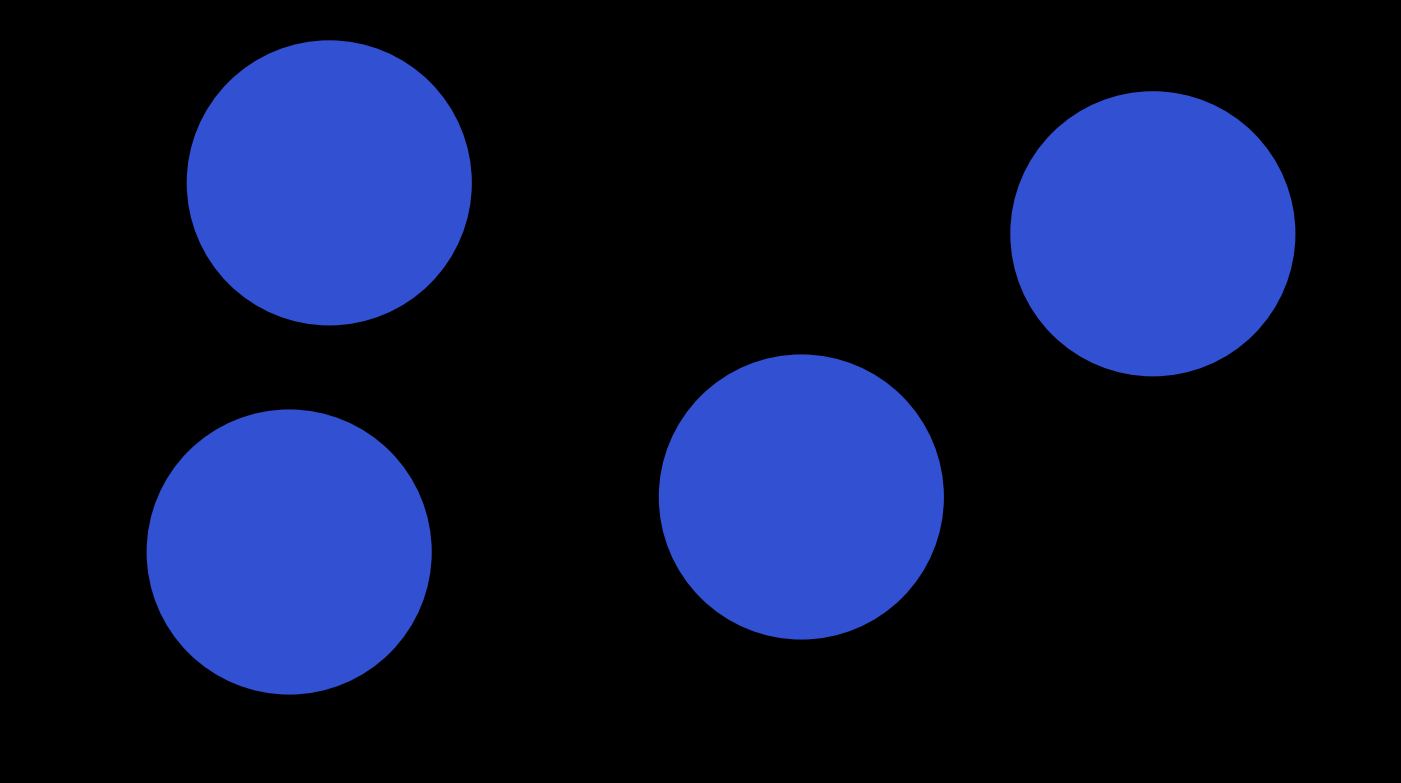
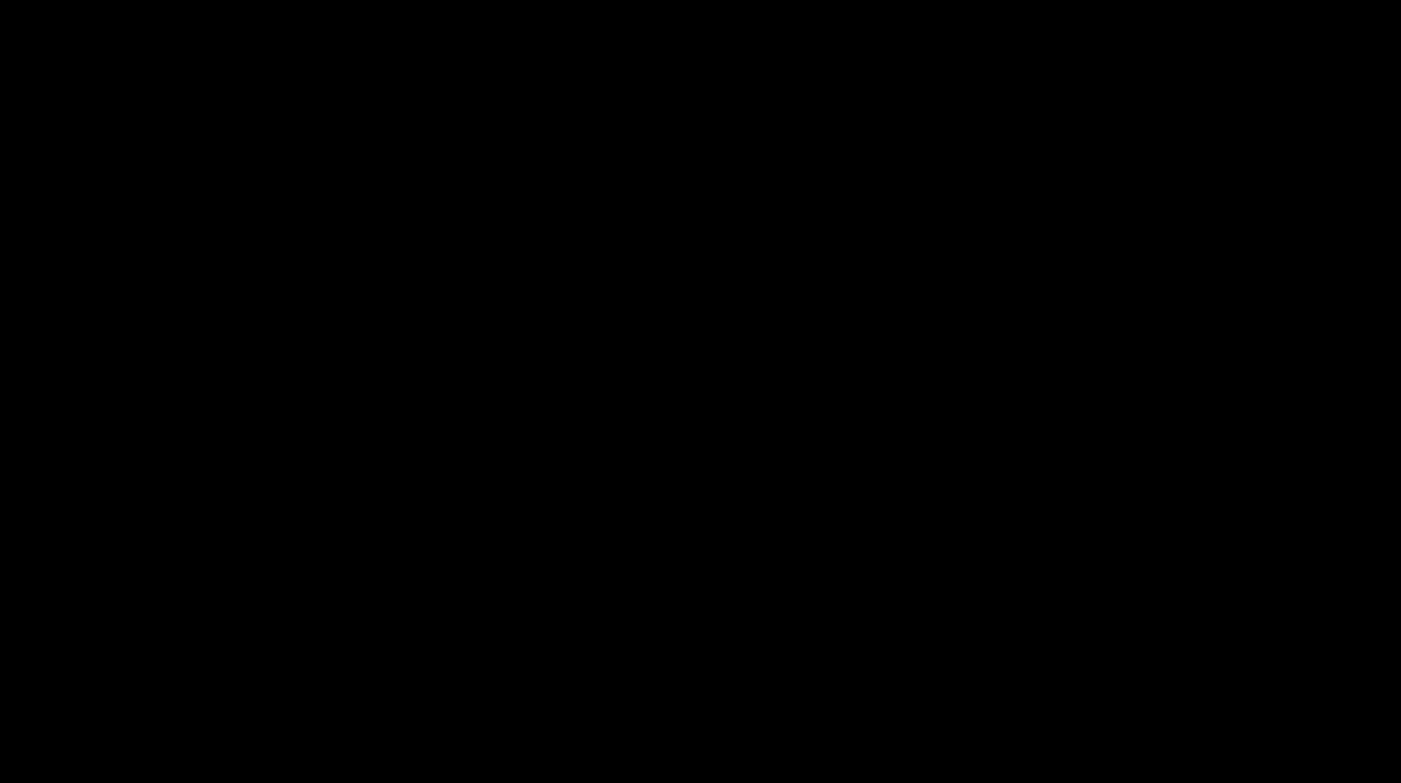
part: (329, 182) -> none
part: (1152, 233) -> none
part: (801, 496) -> none
part: (289, 552) -> none

